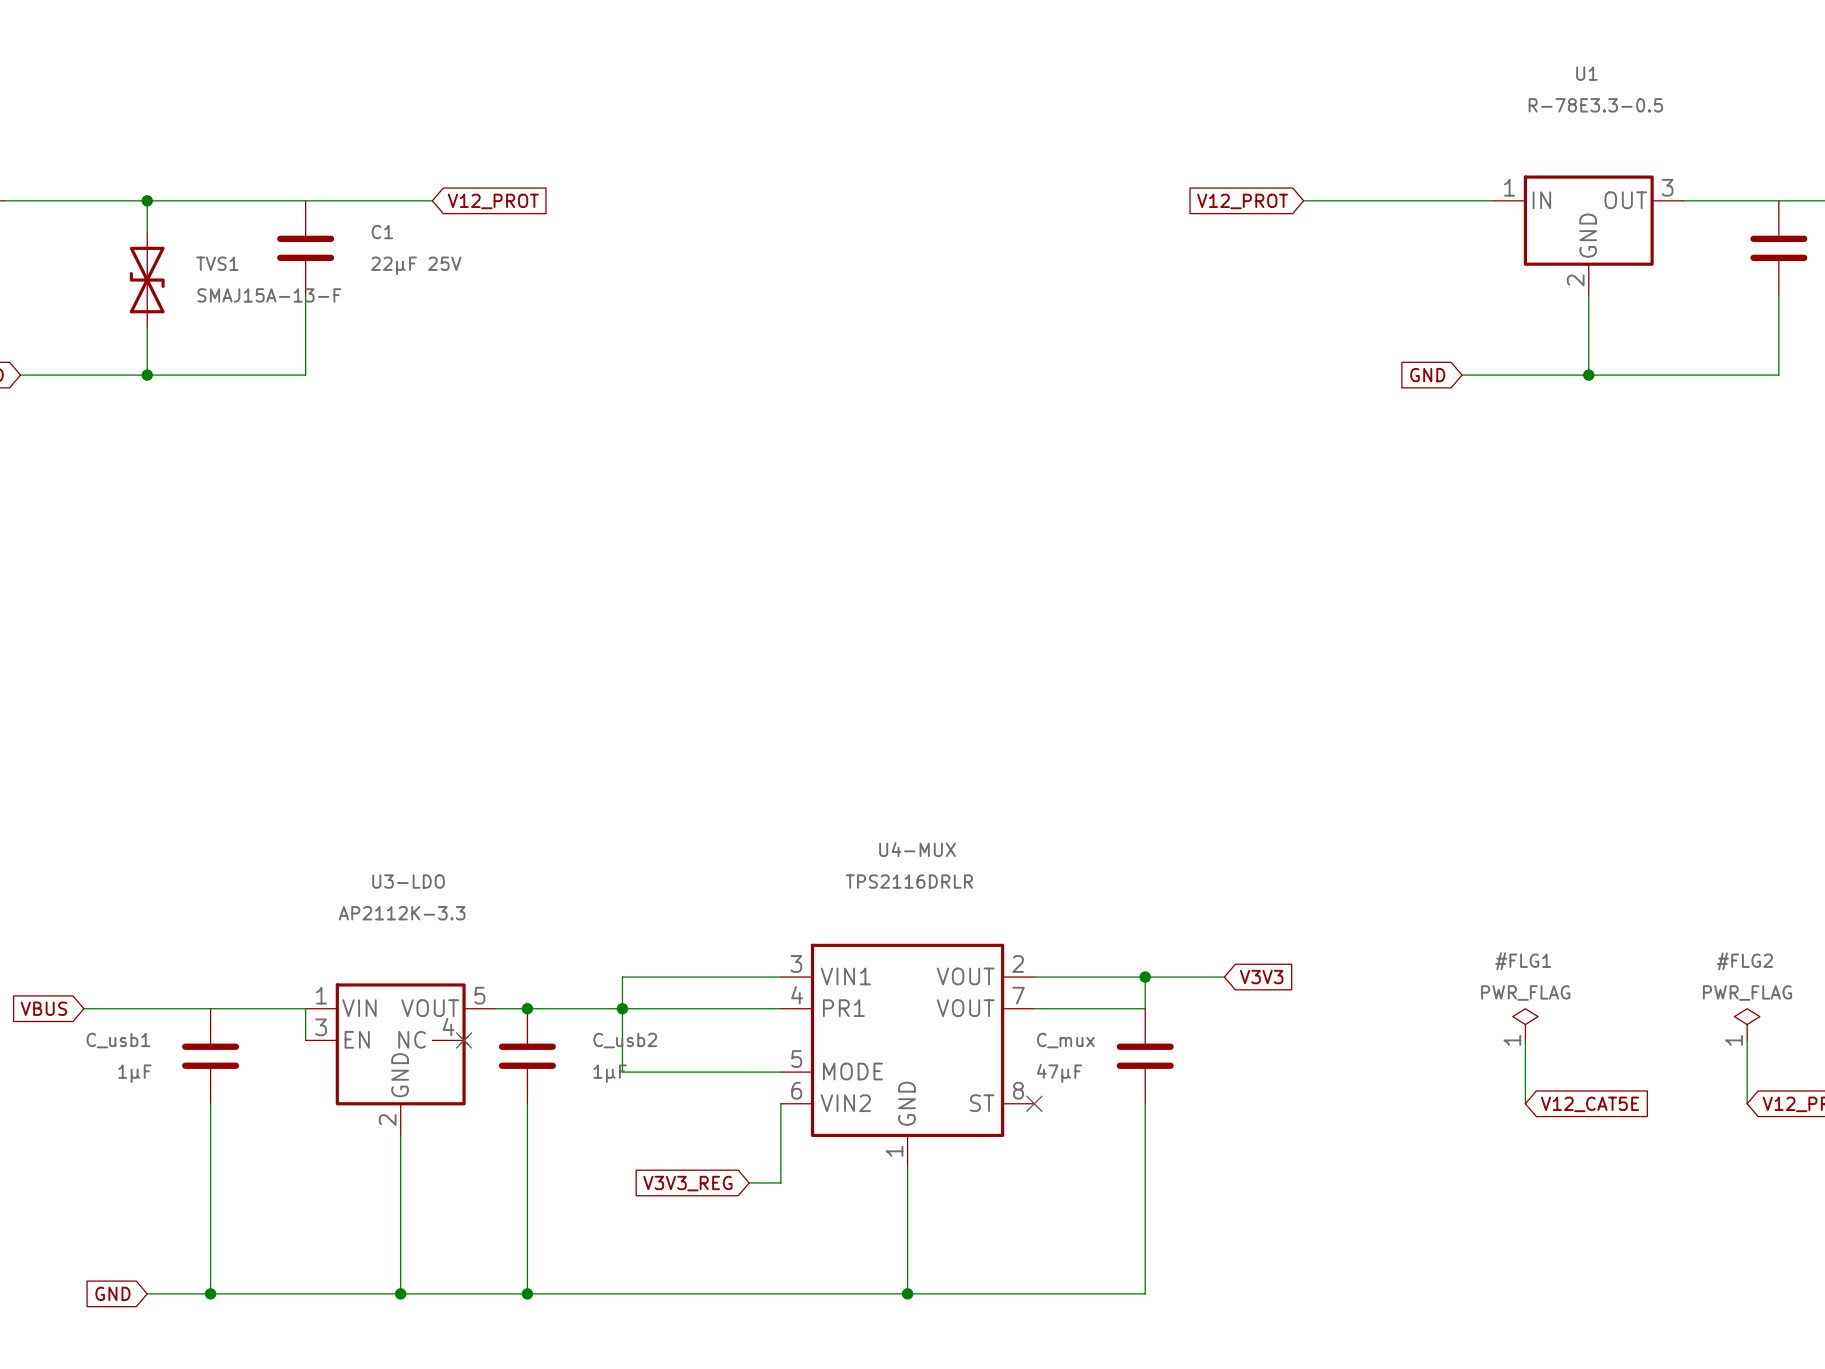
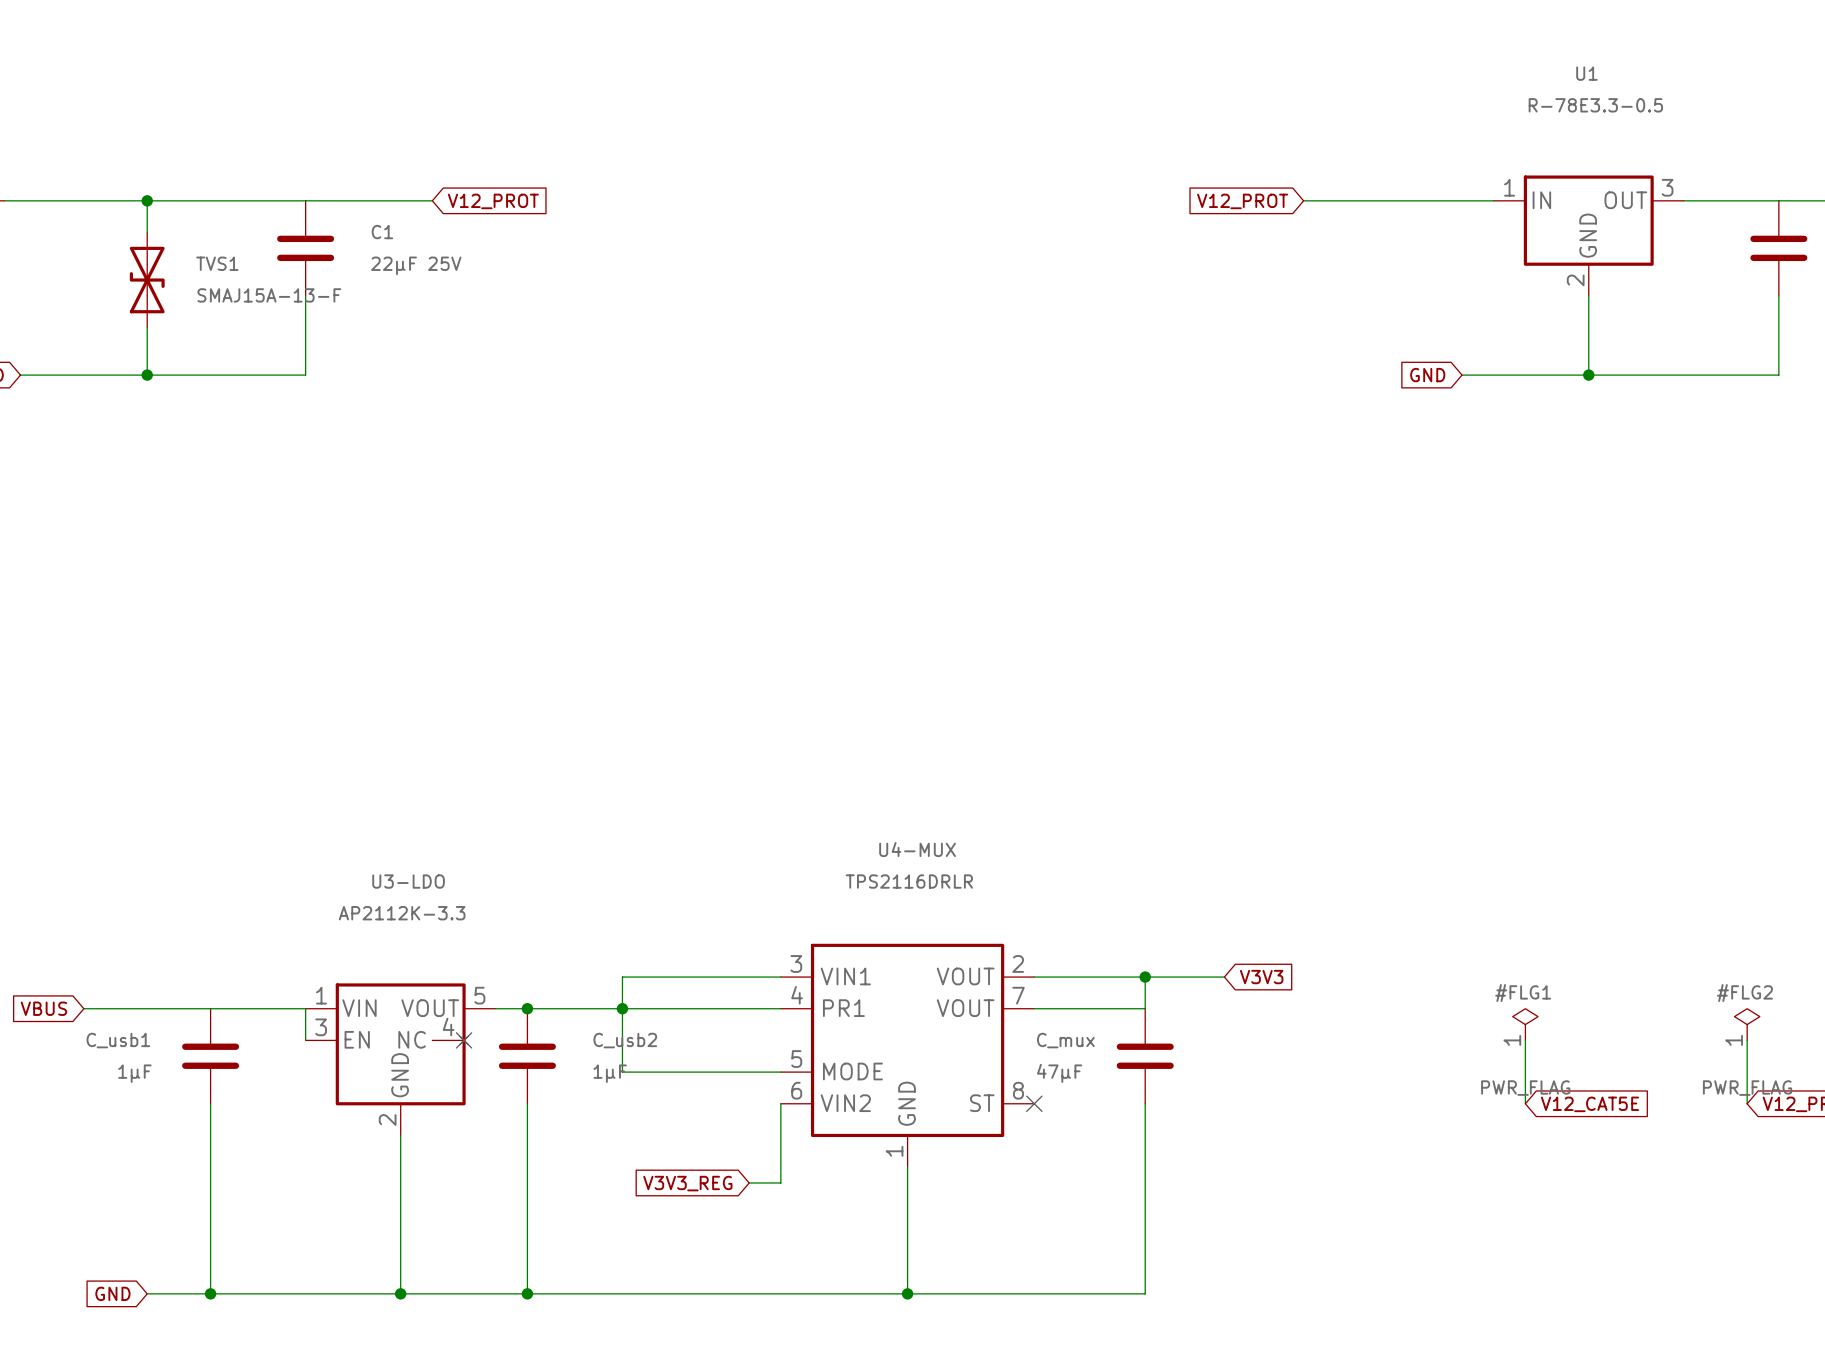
#FLG1 name position: #FLG1 (1523, 961) -> #FLG1 (1523, 993)
#FLG2 name position: #FLG2 (1744, 961) -> #FLG2 (1744, 993)
#FLG1 text position: PWR_FLAG (1525, 993) -> PWR_FLAG (1525, 1088)
#FLG2 text position: PWR_FLAG (1747, 993) -> PWR_FLAG (1747, 1088)

